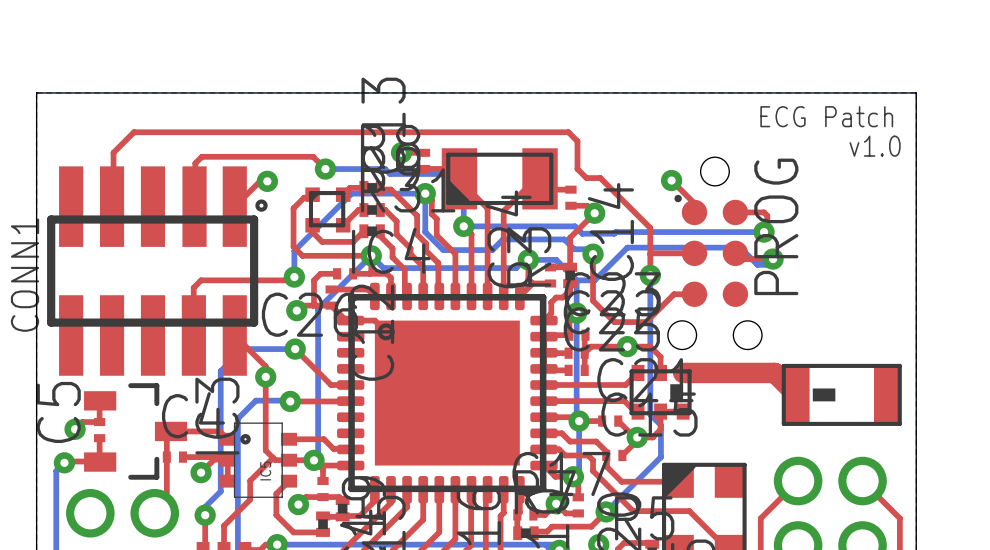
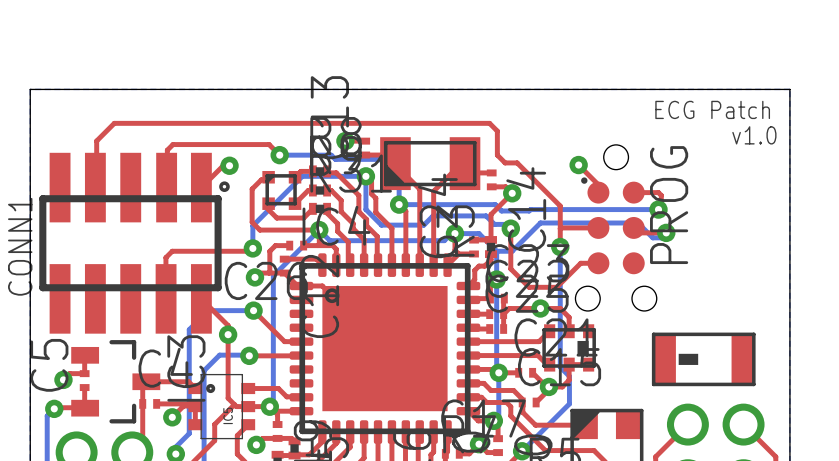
top track: (683, 372) (774, 372) (796, 394) -> none
part position: (841, 394) -> (703, 359)

